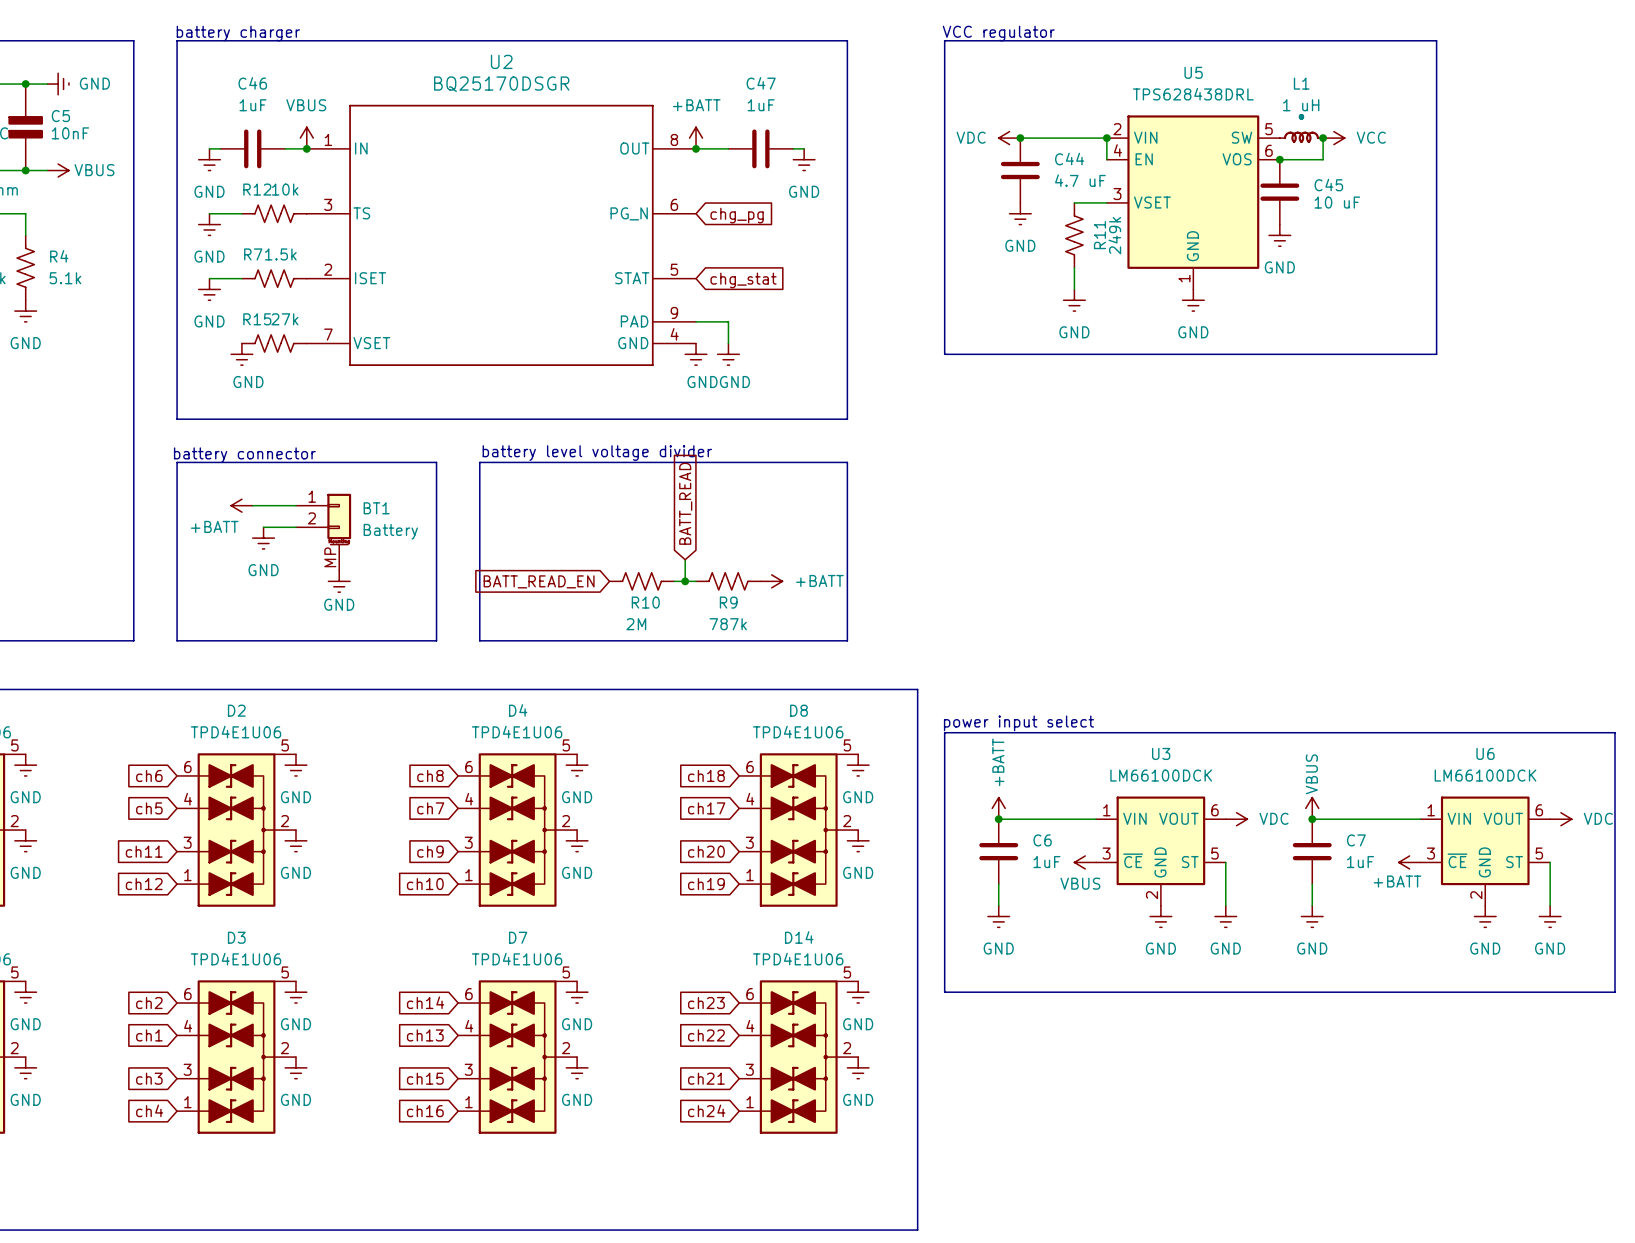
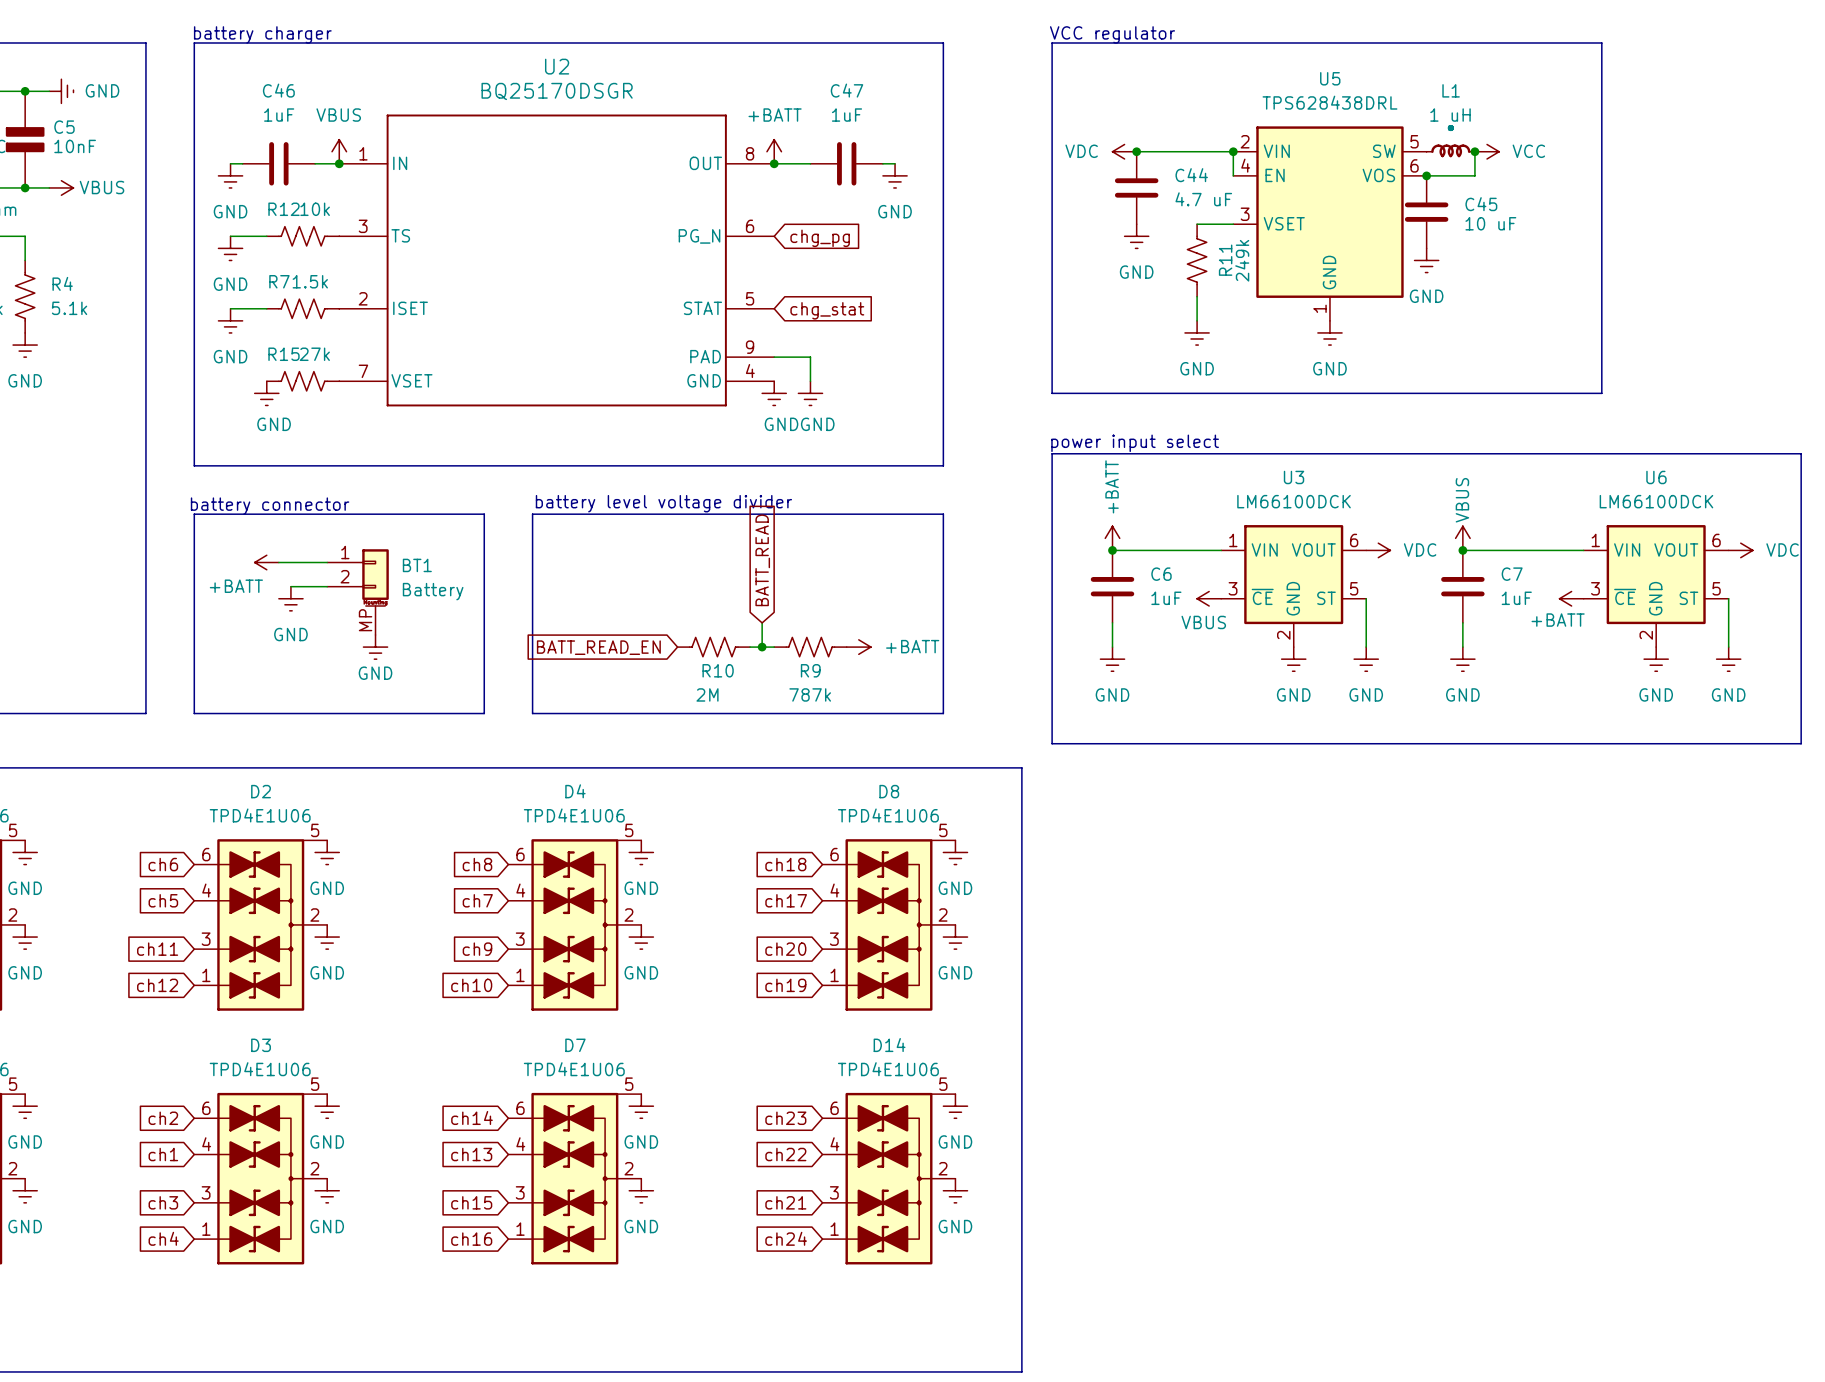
text: none -> power input select (1135, 443)
line: none -> (1052, 453) (1801, 453) (1801, 743) (1052, 743) (1052, 453)
power symbol: none -> +BATT (1112, 538)
power symbol: none -> VBUS (1462, 538)
wire: none -> (1112, 550) (1221, 550)
junction: none -> (1112, 550)
power symbol: none -> VDC (1378, 550)
wire: none -> (1462, 550) (1583, 550)
junction: none -> (1462, 550)
power symbol: none -> VDC (1740, 550)
power symbol: none -> VBUS (1209, 598)
wire: none -> (1366, 598) (1366, 647)
power symbol: none -> +BATT (1571, 598)
wire: none -> (1728, 598) (1728, 647)
wire: none -> (1112, 622) (1112, 647)
wire: none -> (1462, 622) (1462, 647)
power symbol: none -> GND (1112, 659)
power symbol: none -> GND (1293, 659)
power symbol: none -> GND (1366, 659)
power symbol: none -> GND (1462, 659)
power symbol: none -> GND (1656, 659)
power symbol: none -> GND (1728, 659)
text: power input select (1018, 723) -> none
line: (944, 732) (1614, 732) (1614, 992) (944, 992) (944, 732) -> none
power symbol: +BATT (998, 808) -> none
power symbol: VBUS (1312, 808) -> none
wire: (998, 819) (1096, 819) -> none
junction: (998, 819) -> none
power symbol: VDC (1236, 819) -> none
wire: (1312, 819) (1420, 819) -> none
junction: (1312, 819) -> none
power symbol: VDC (1560, 819) -> none
C6 position: (998, 851) -> (1112, 586)
U3 position: (1160, 851) -> (1293, 586)
C7 position: (1312, 851) -> (1462, 586)
U6 position: (1485, 851) -> (1656, 586)
power symbol: VBUS (1085, 862) -> none
wire: (1225, 862) (1225, 905) -> none
power symbol: +BATT (1409, 862) -> none
wire: (1550, 862) (1550, 905) -> none
wire: (998, 884) (998, 905) -> none
wire: (1312, 884) (1312, 905) -> none
power symbol: GND (998, 916) -> none
power symbol: GND (1160, 916) -> none
power symbol: GND (1225, 916) -> none
power symbol: GND (1312, 916) -> none
power symbol: GND (1485, 916) -> none
power symbol: GND (1550, 916) -> none

